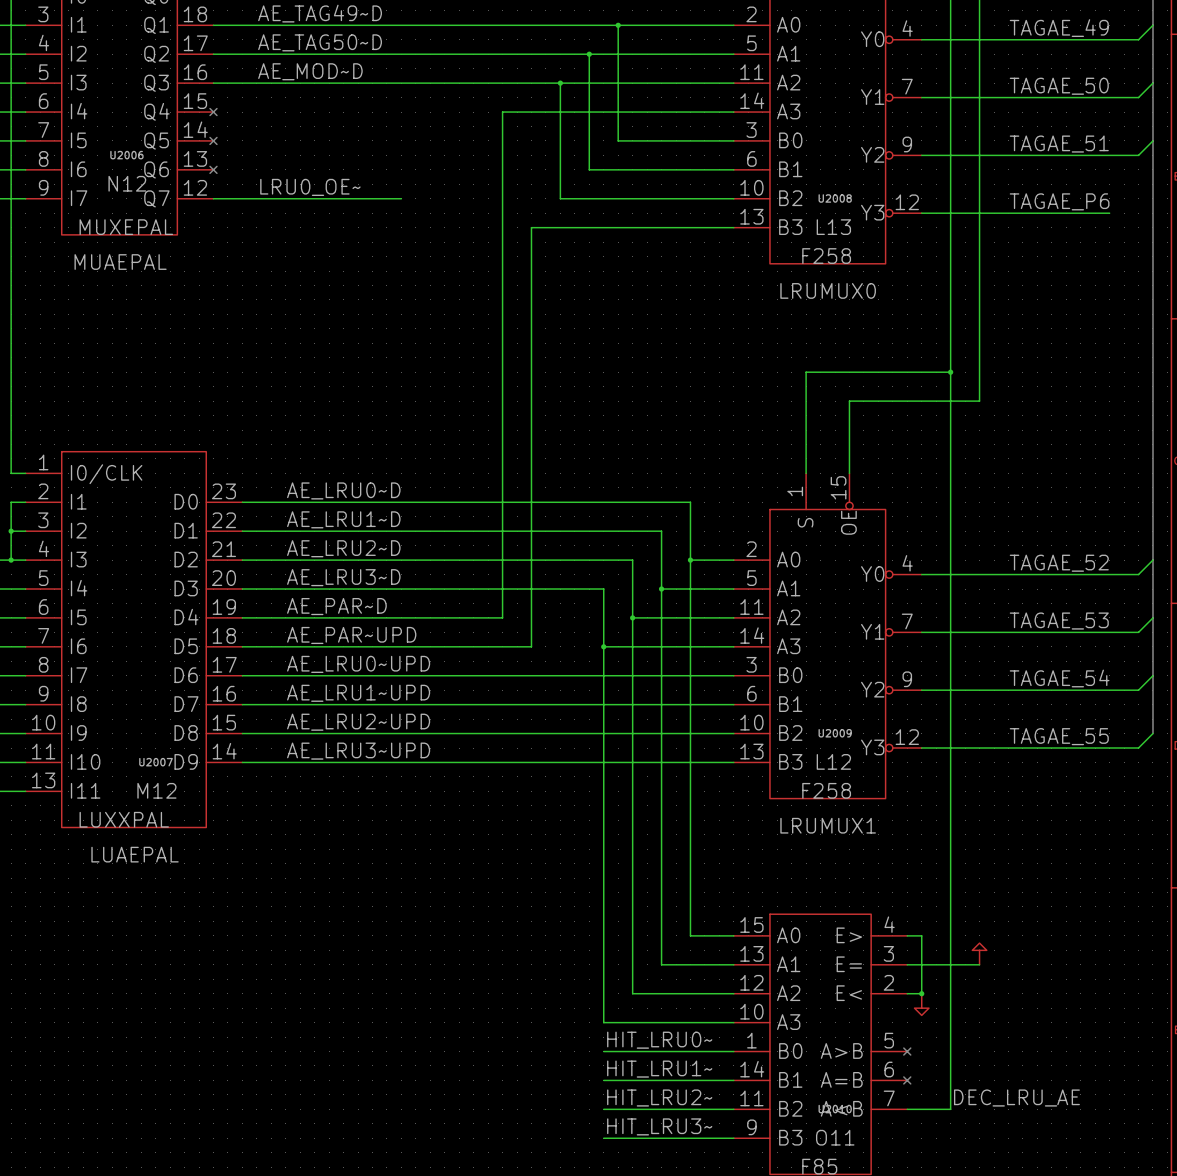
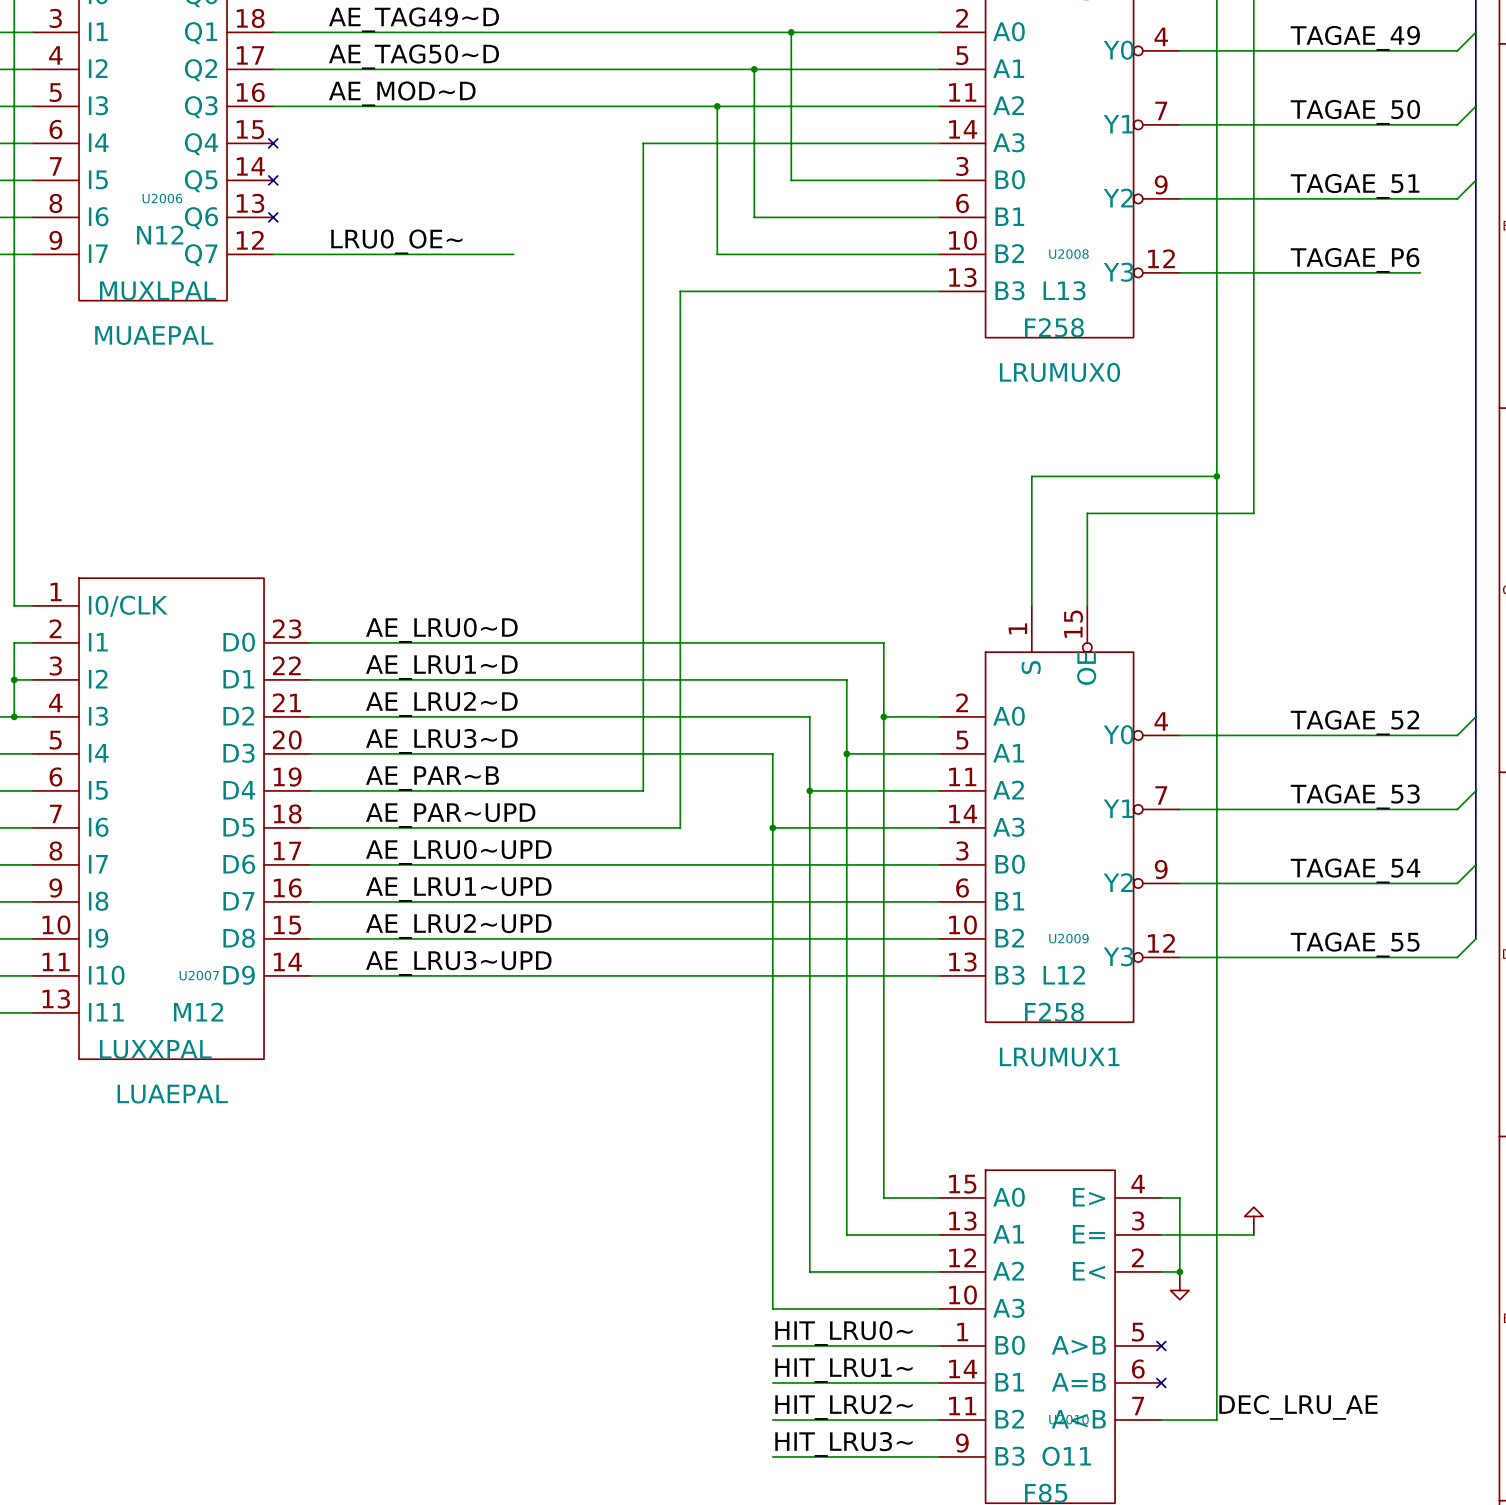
U2006 value: MUXEPAL (126, 227) -> MUXLPAL (158, 290)
label: AE_PAR~D (336, 606) -> AE_PAR~B (432, 778)

